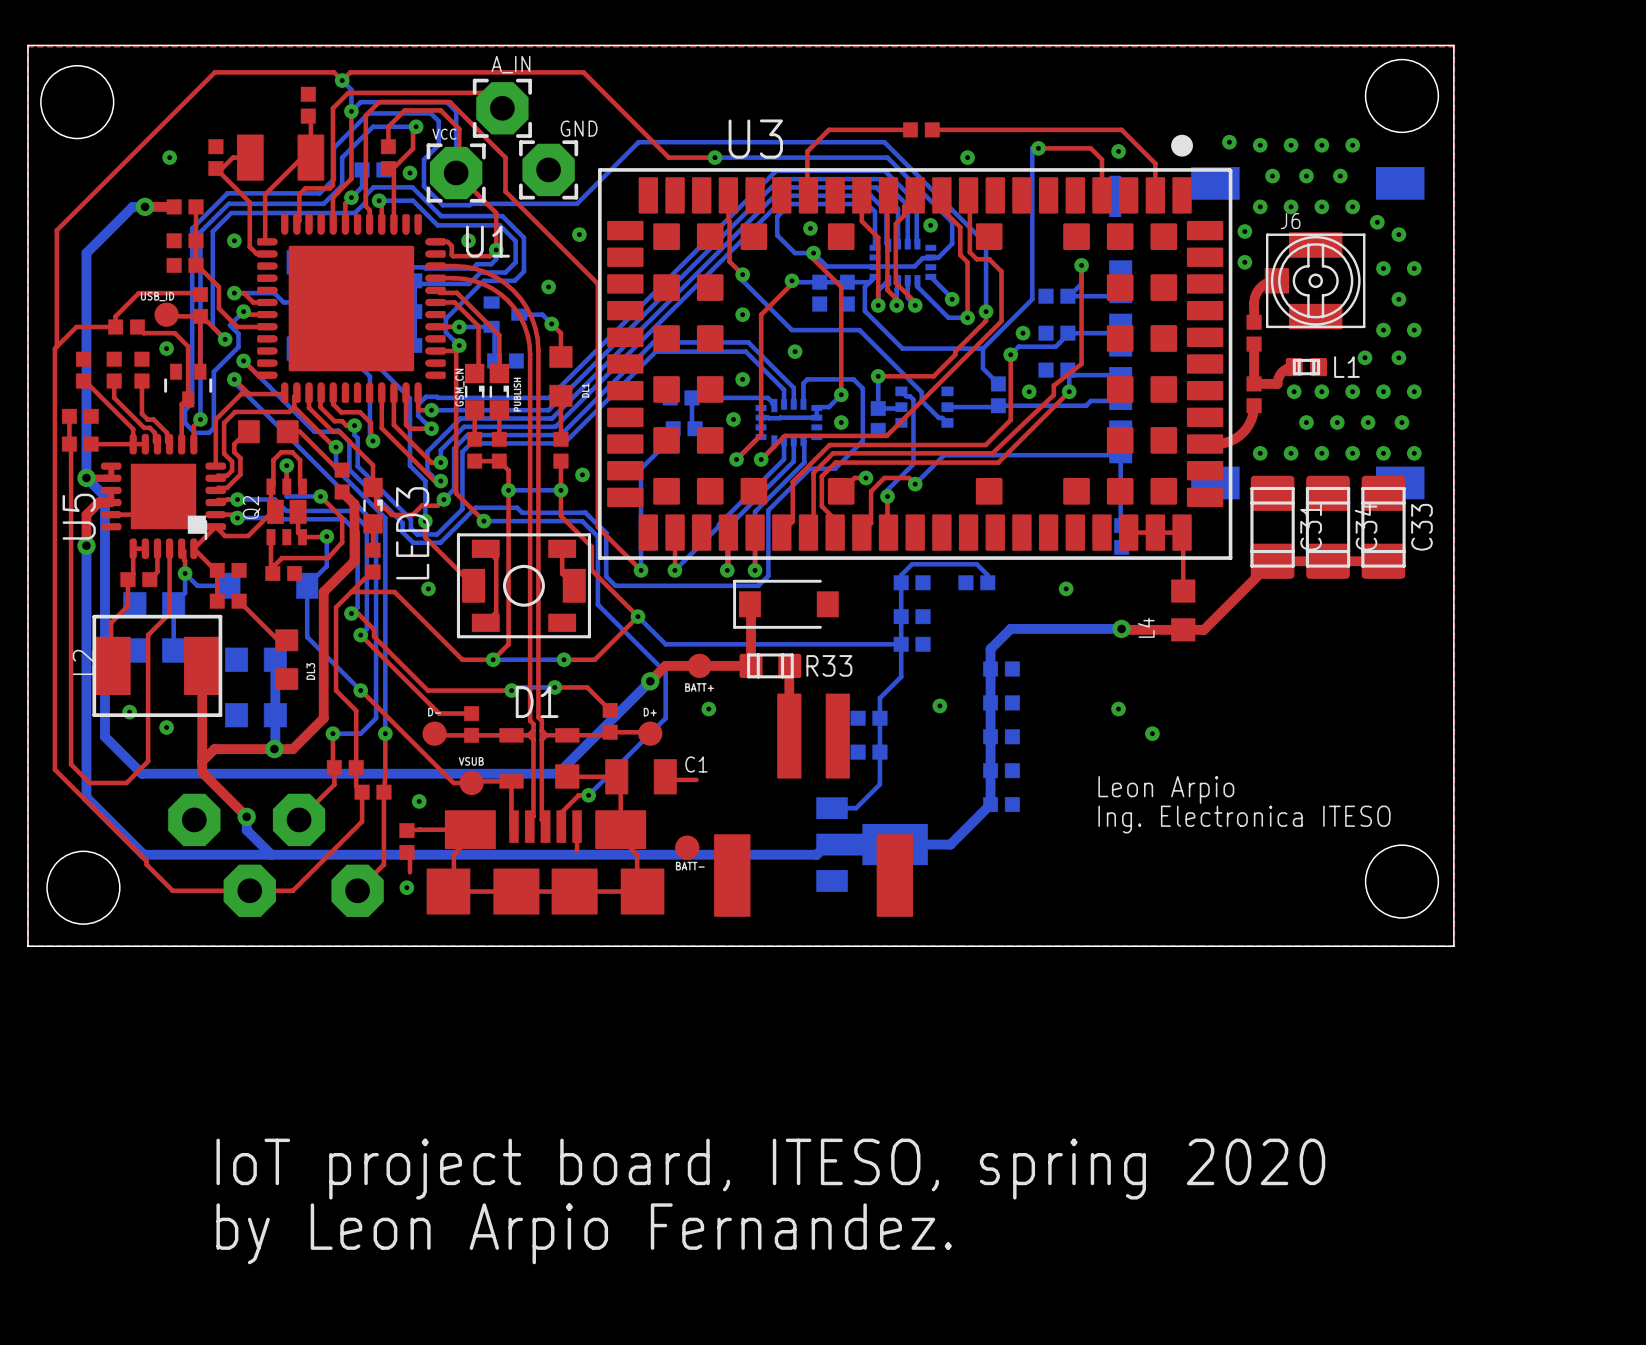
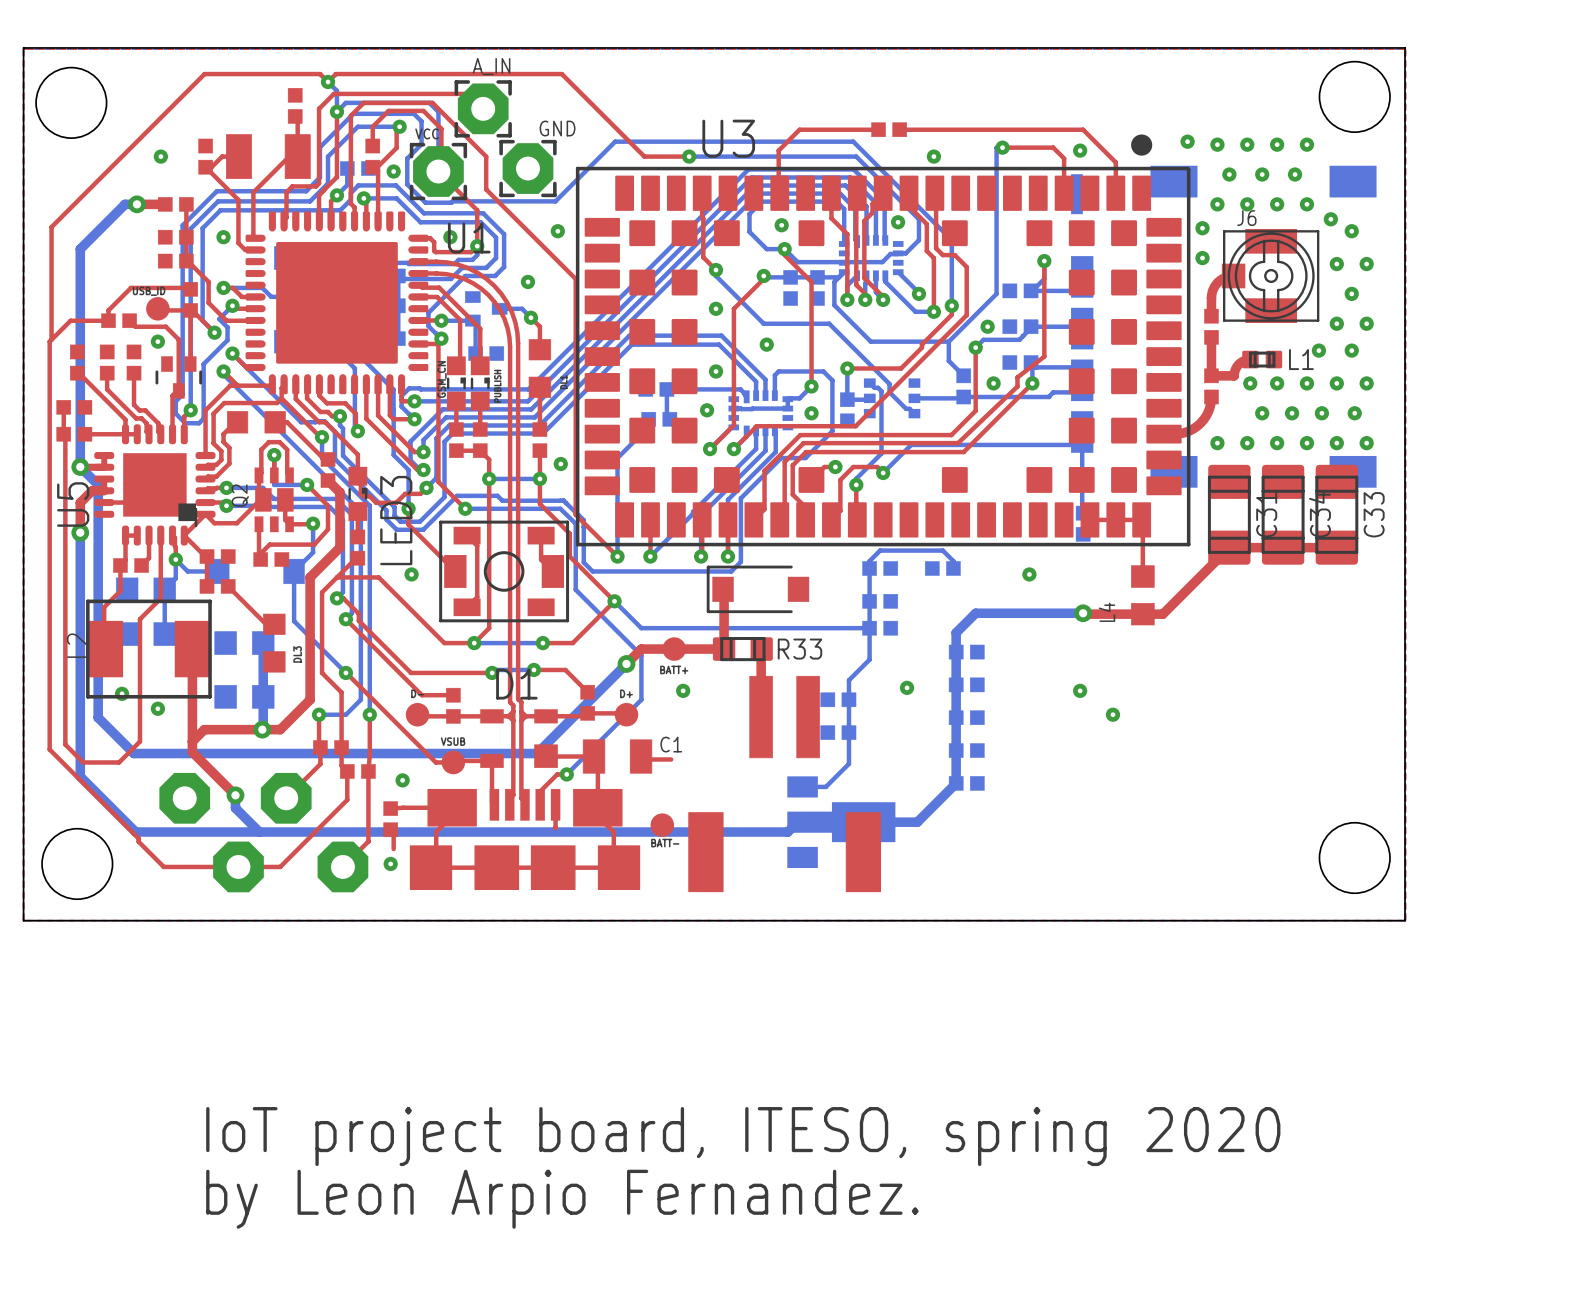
text: Leon Arpio (1166, 789) -> none
text: Ing. Electronica ITESO (1244, 819) -> none

